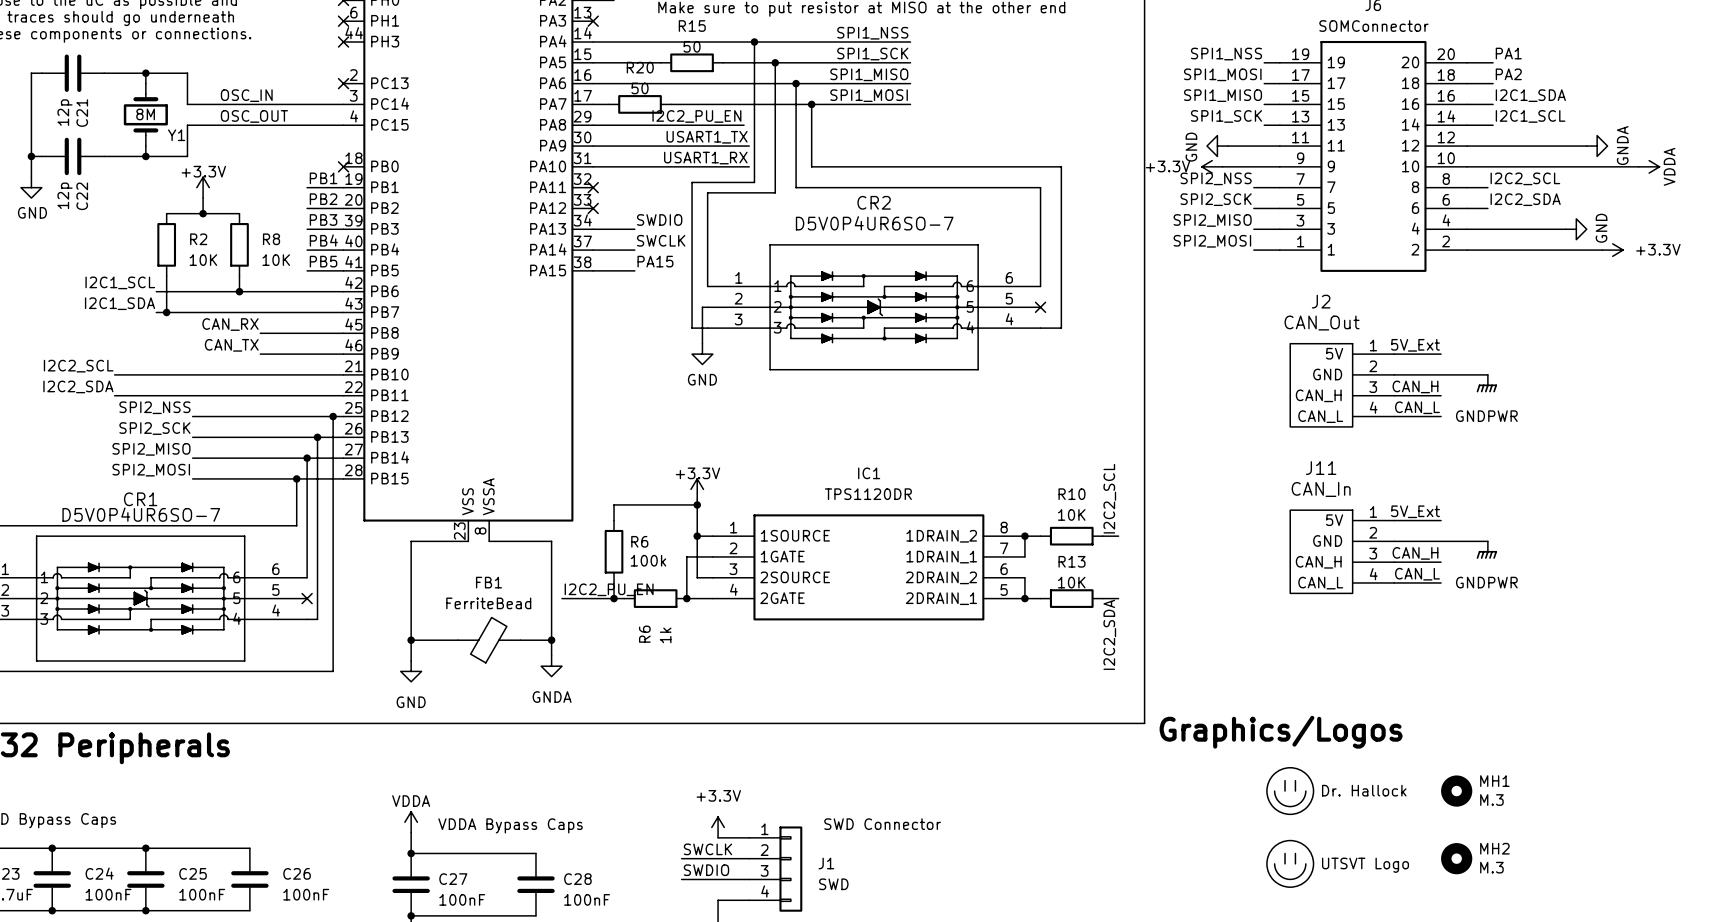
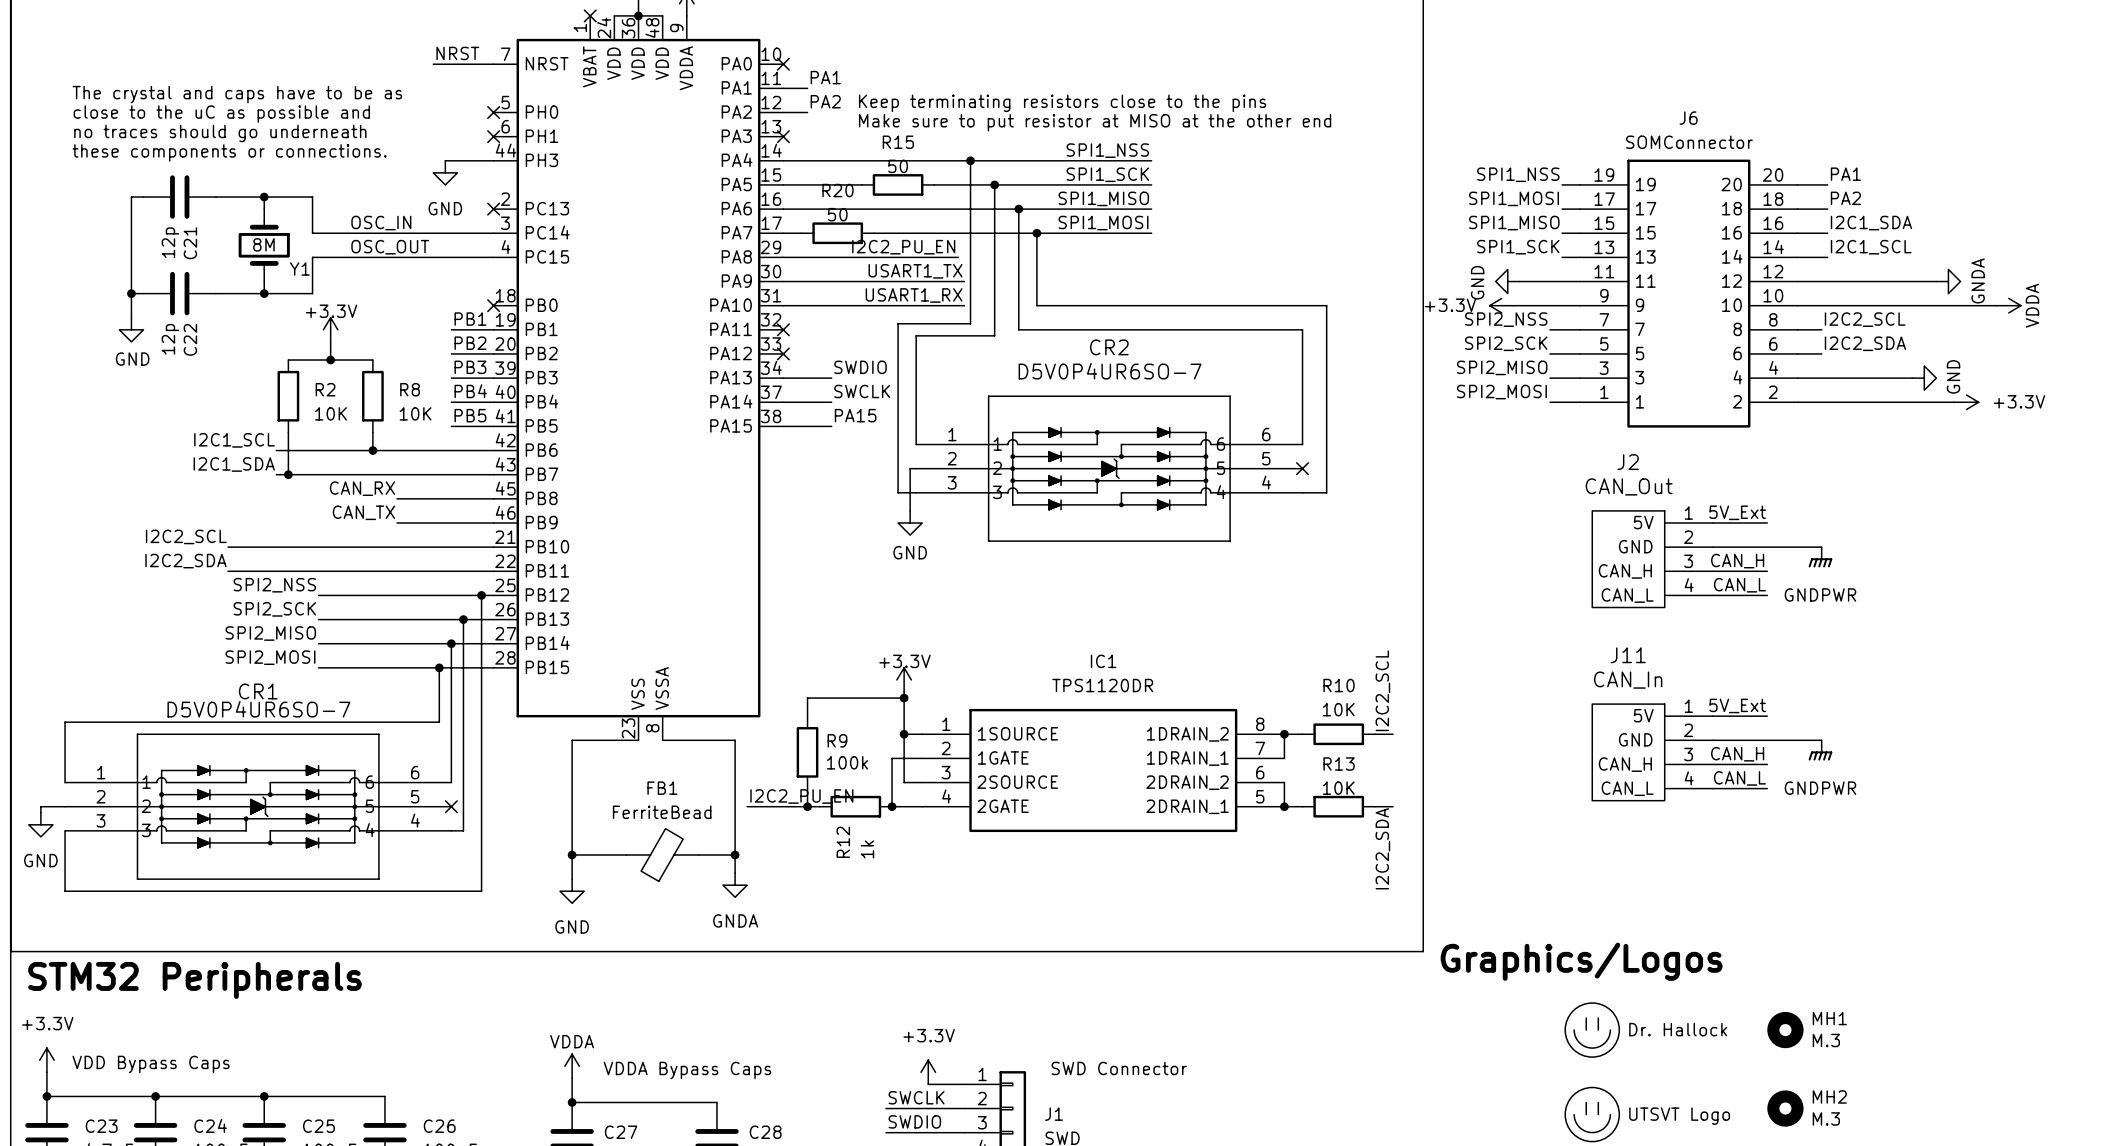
wire: none -> (445, 160) (493, 160)
no-connect mark: (343, 42) -> none
power symbol: none -> GND (445, 172)
R6 name: R6 (639, 541) -> R9 (837, 740)
R6 name: R6 (644, 634) -> R12 (843, 842)

